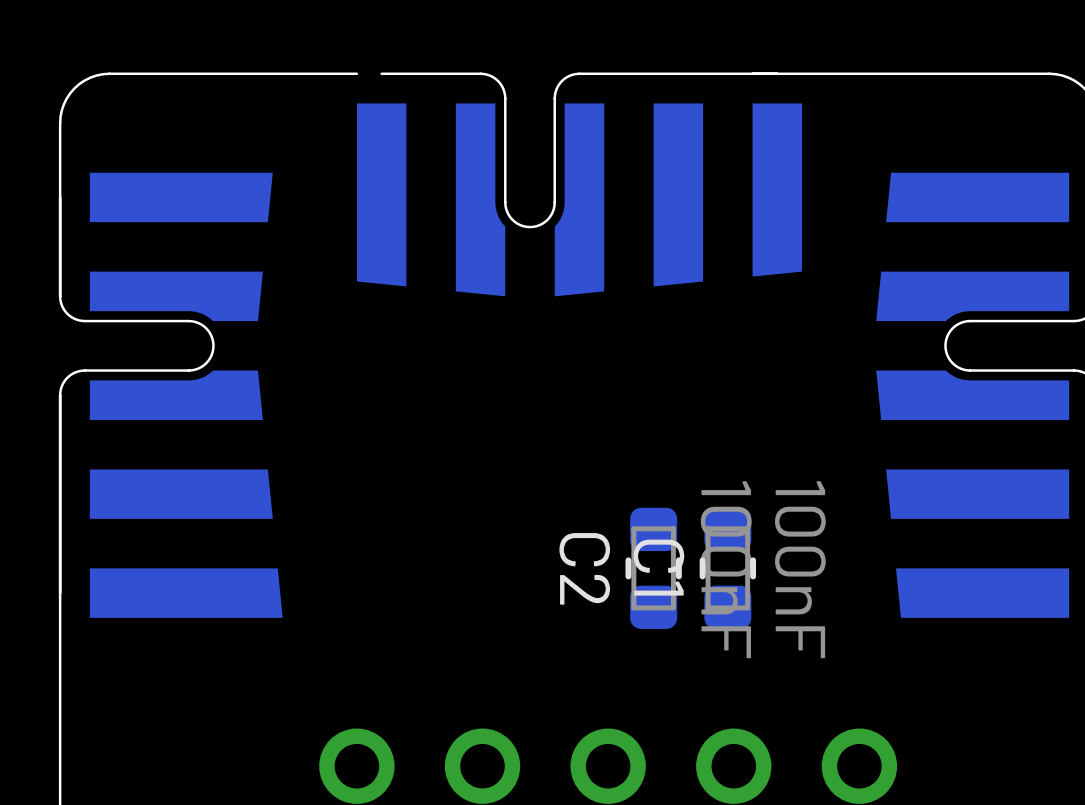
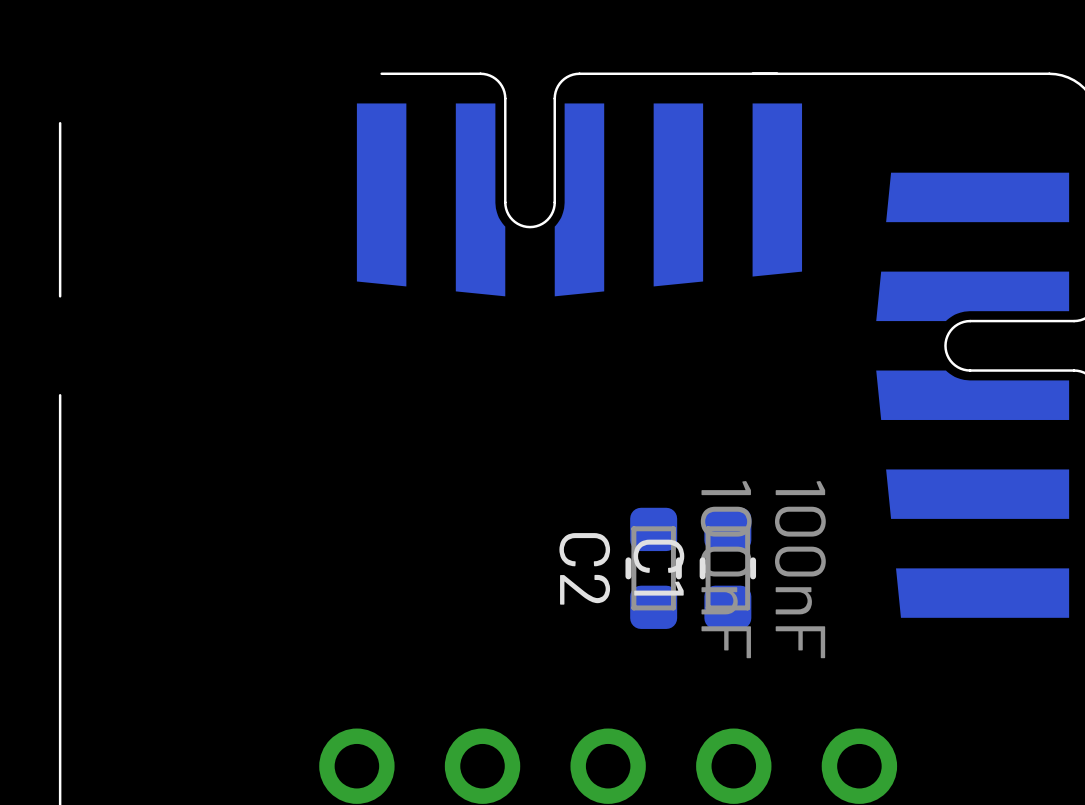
board edge: (356, 73) (103, 74) (90, 77) (74, 88) (63, 104) (60, 123) -> none
part: (170, 395) -> none

